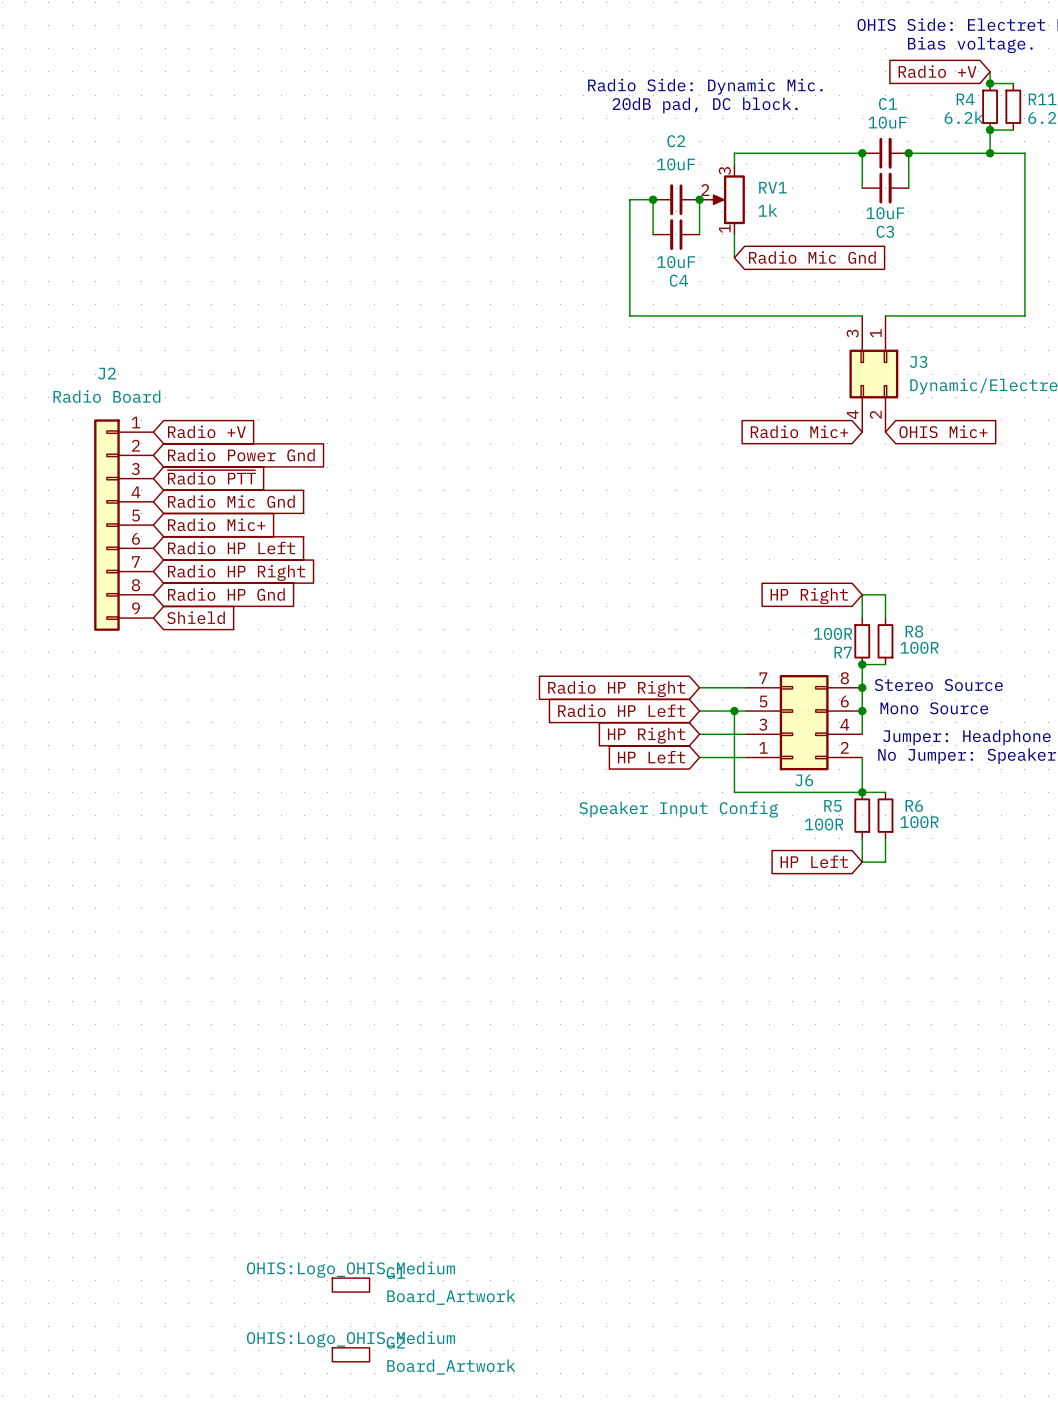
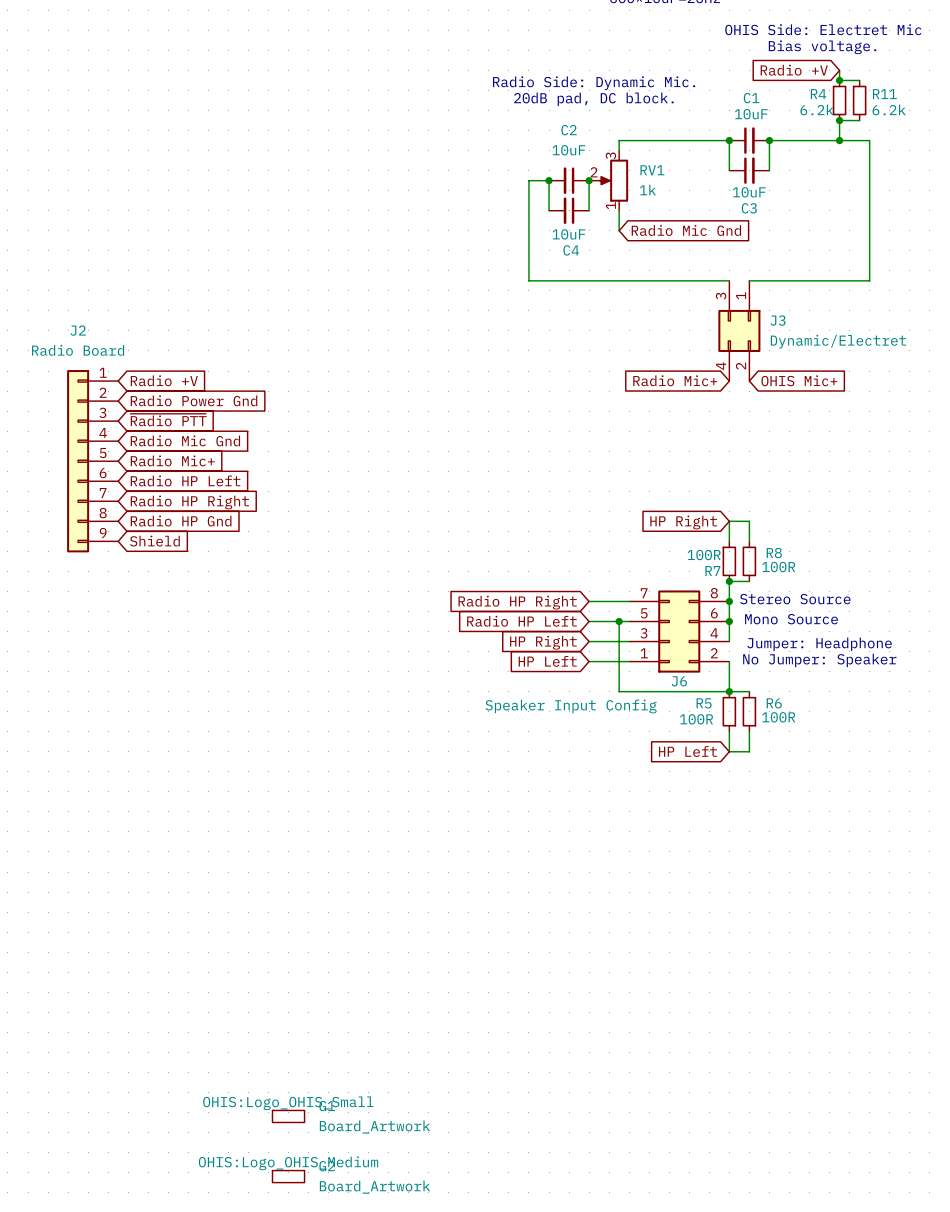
G1 text: OHIS:Logo_OHIS_Medium (350, 1269) -> OHIS:Logo_OHIS_Small (288, 1103)

